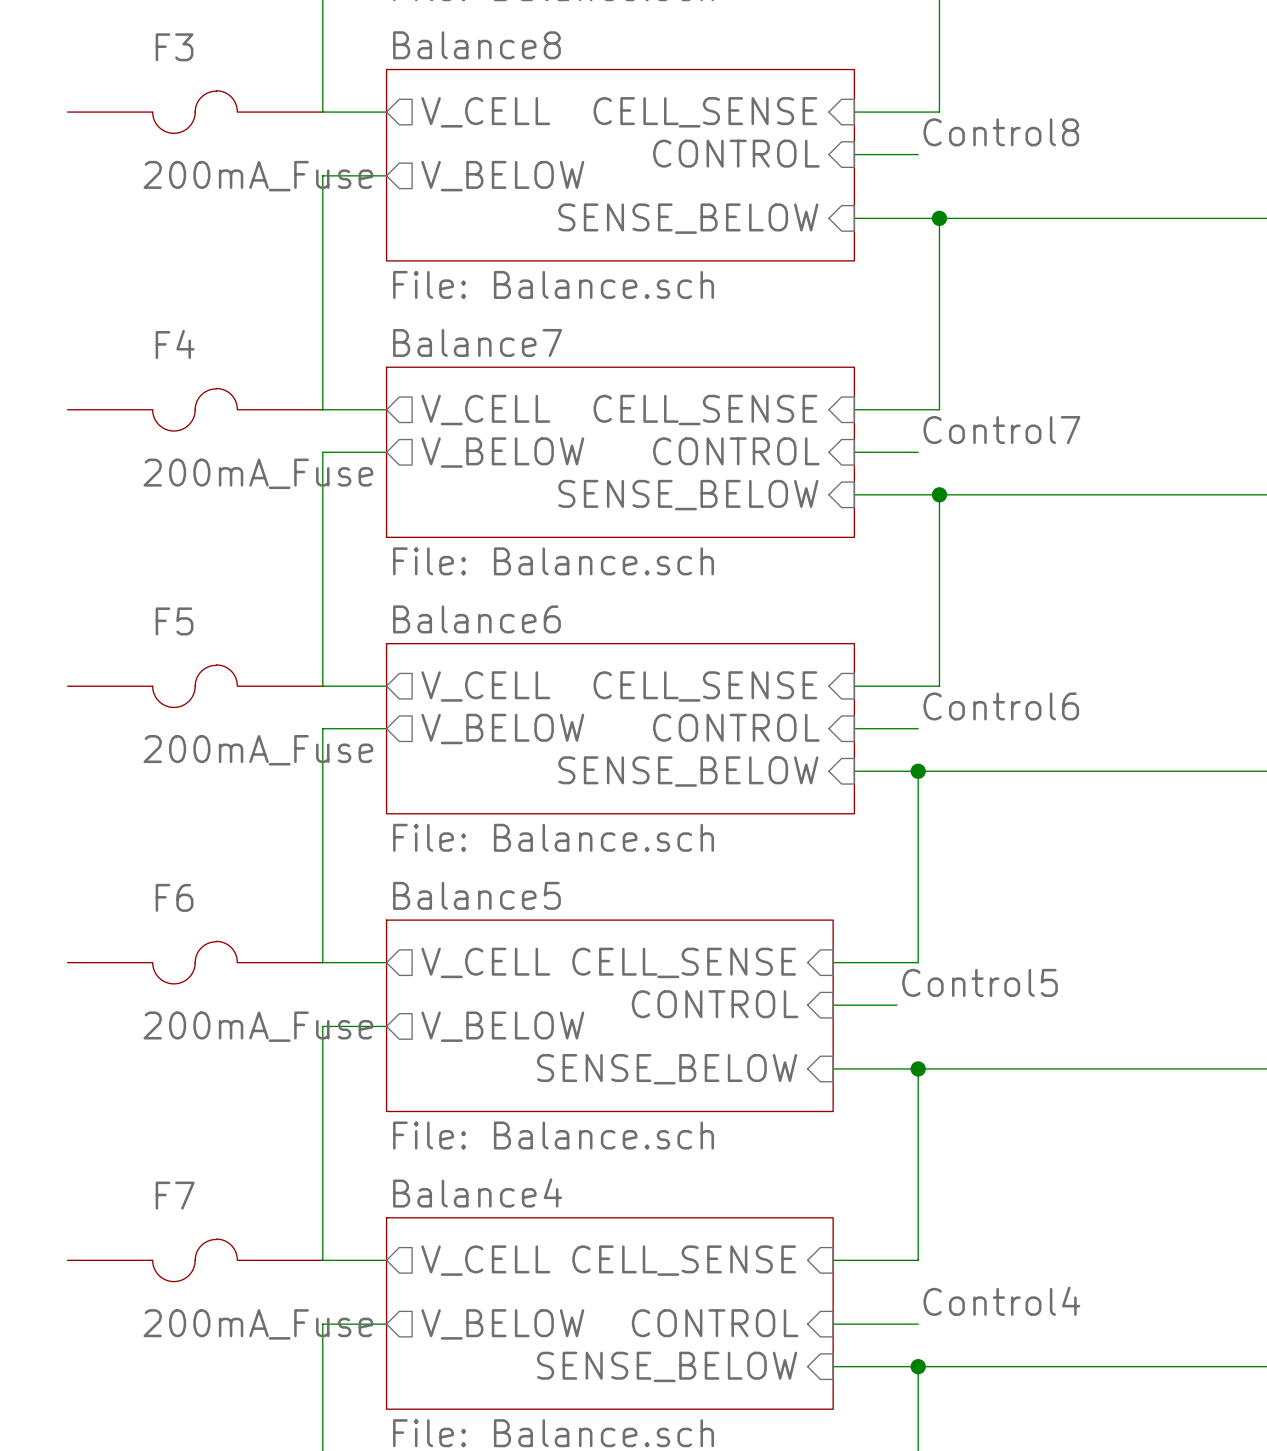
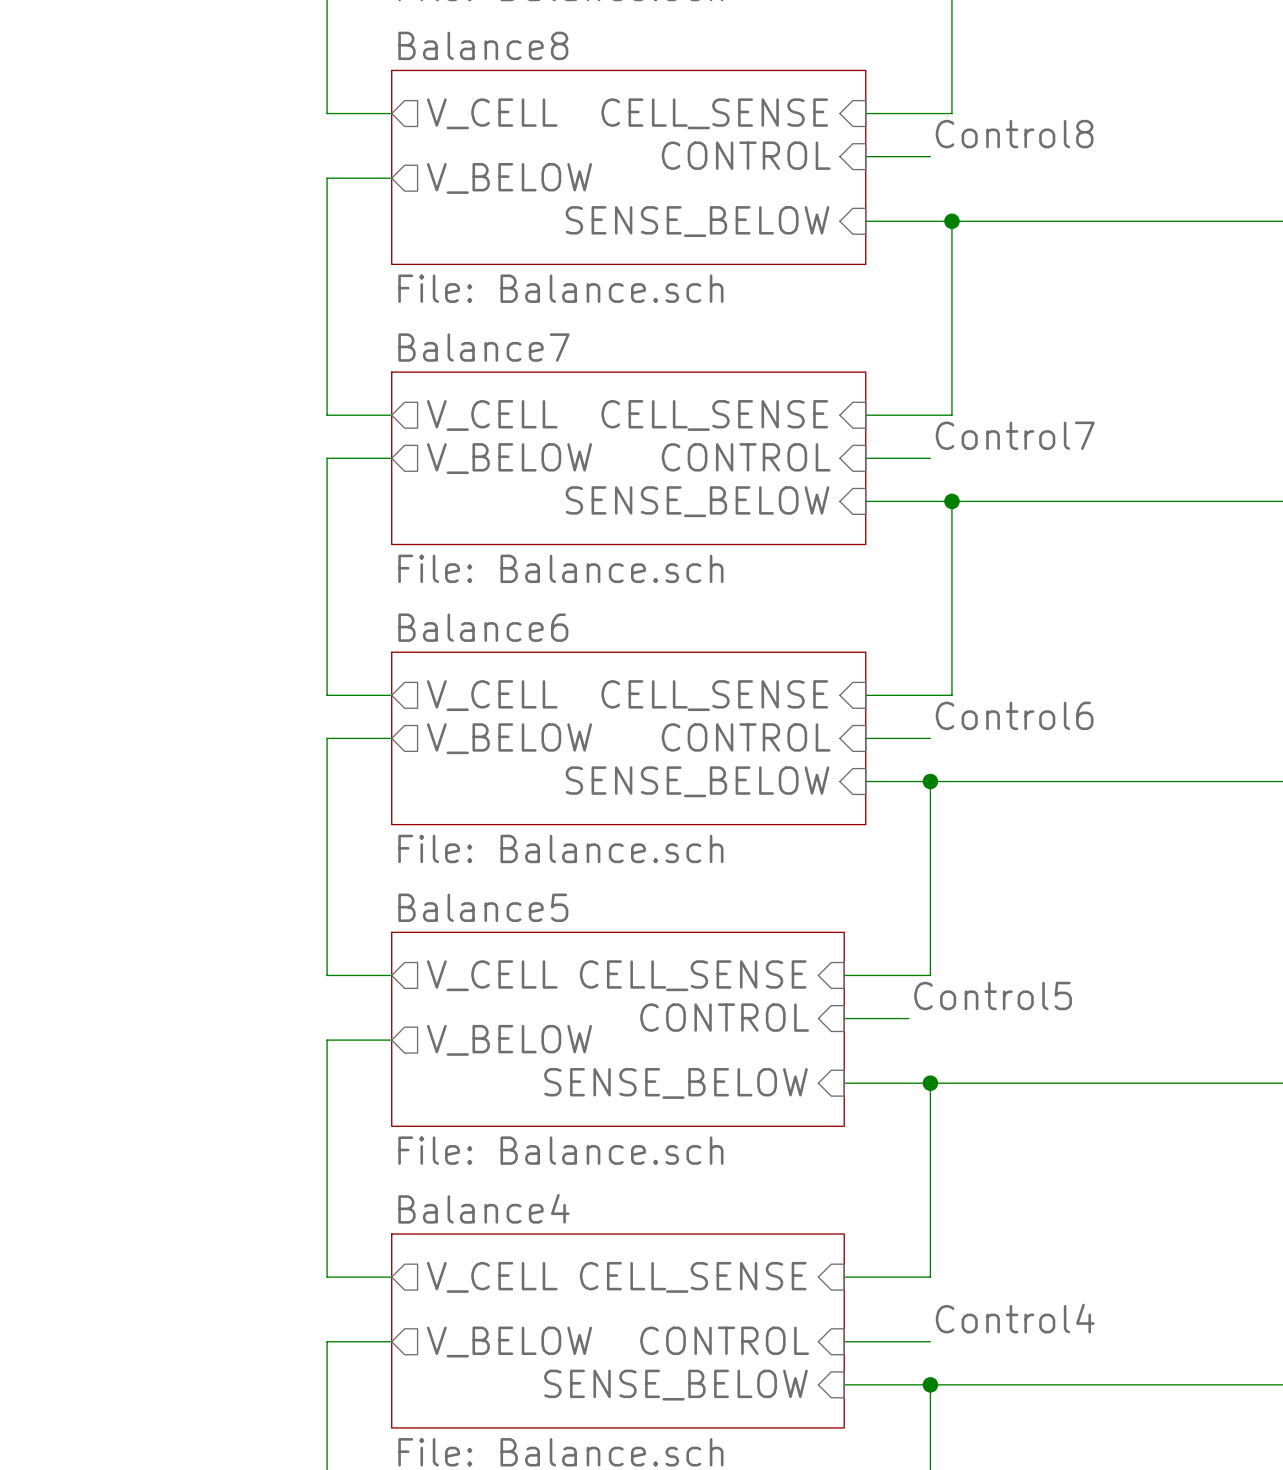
F3: 200mA_Fuse (195, 112) -> none
F4: 200mA_Fuse (195, 409) -> none
F5: 200mA_Fuse (195, 686) -> none
F6: 200mA_Fuse (195, 962) -> none
F7: 200mA_Fuse (195, 1260) -> none

